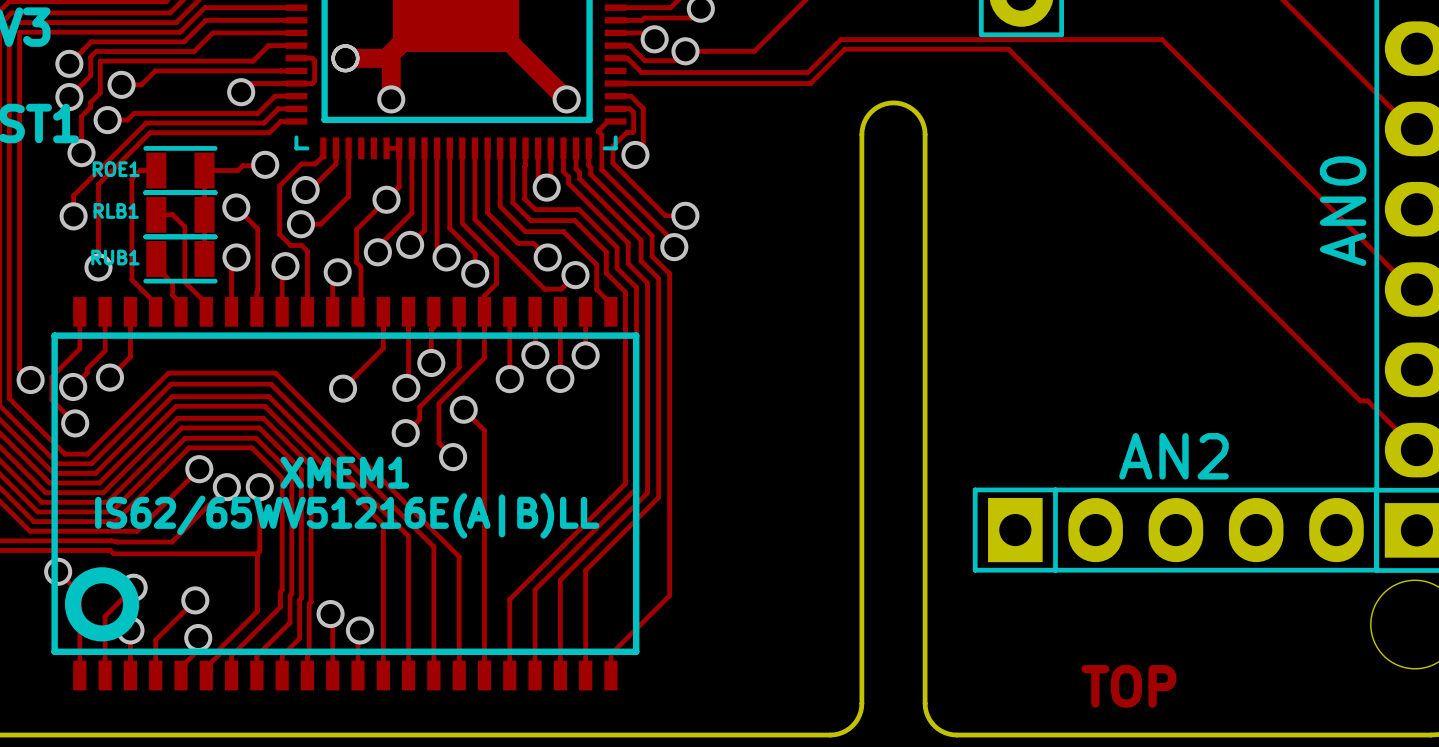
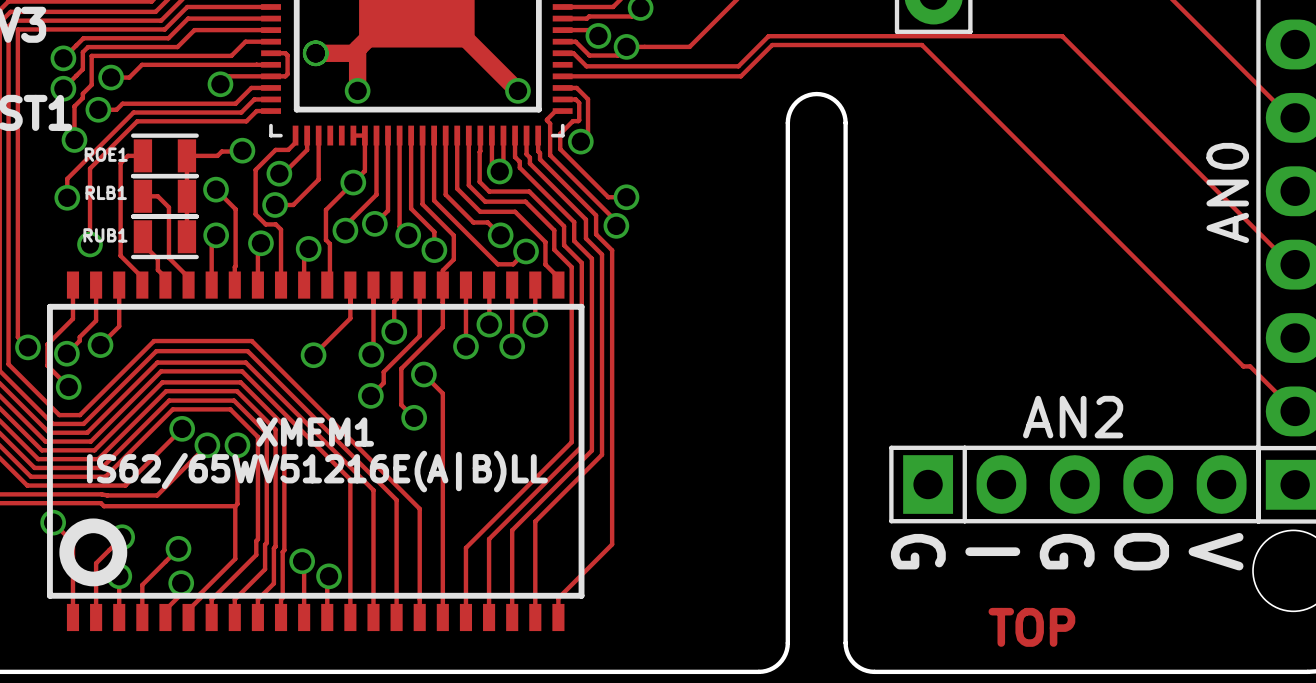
text: none -> G (918, 551)
text: none -> I (992, 551)
text: none -> G (1067, 551)
text: none -> O (1141, 551)
text: none -> V (1216, 551)

